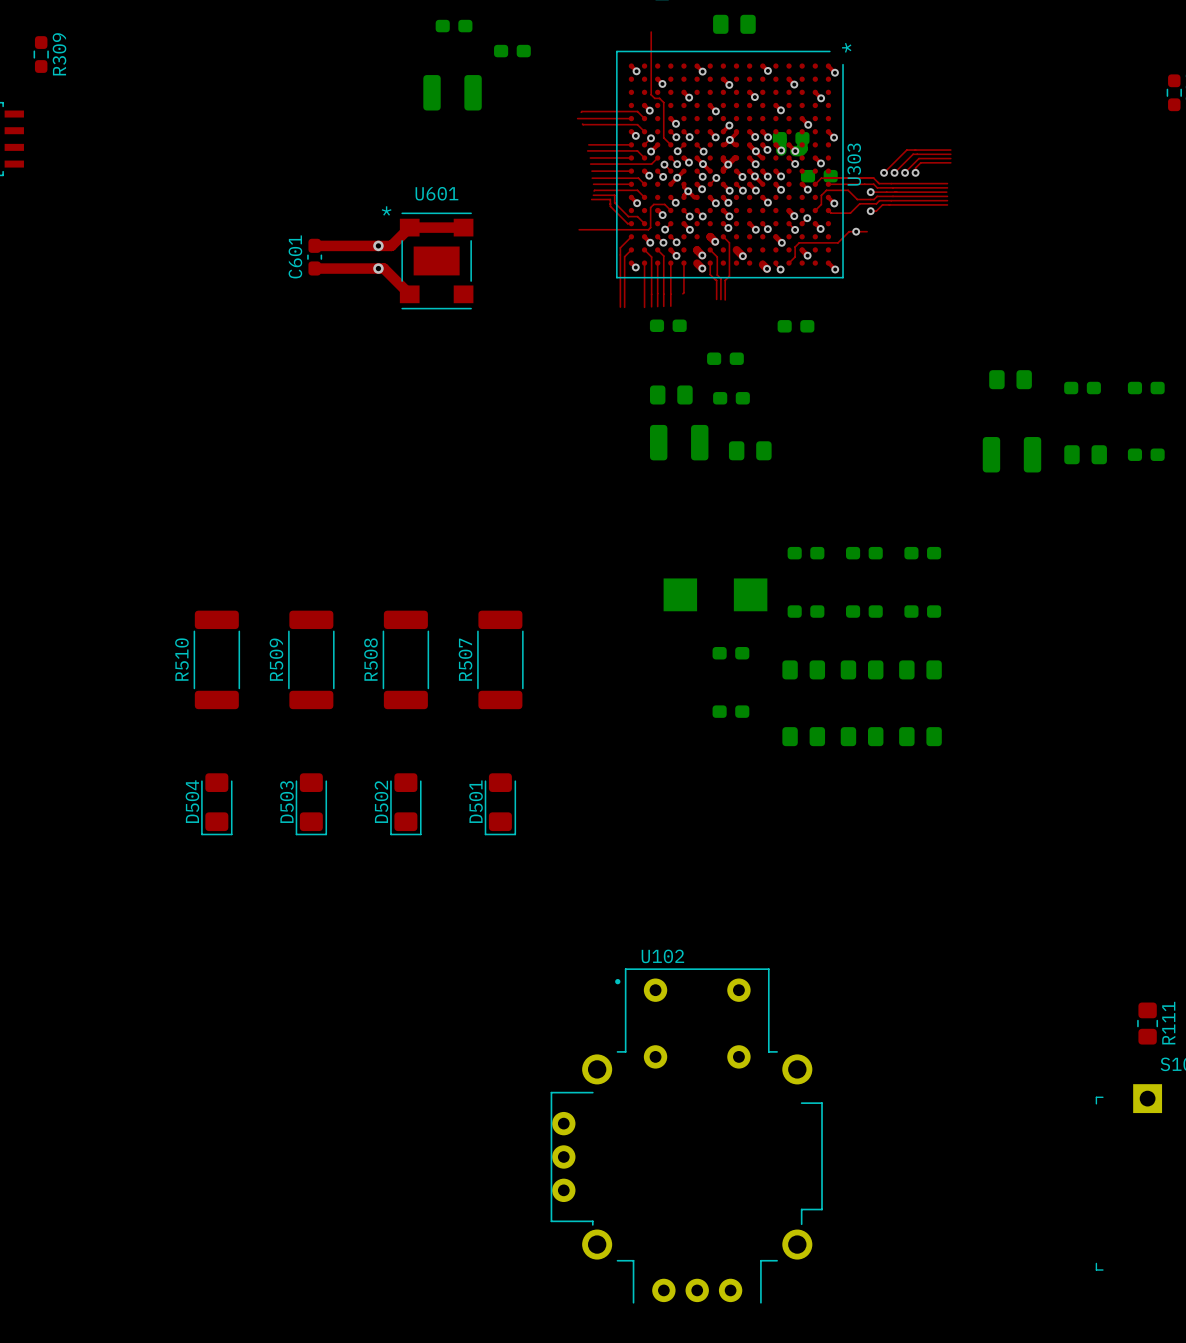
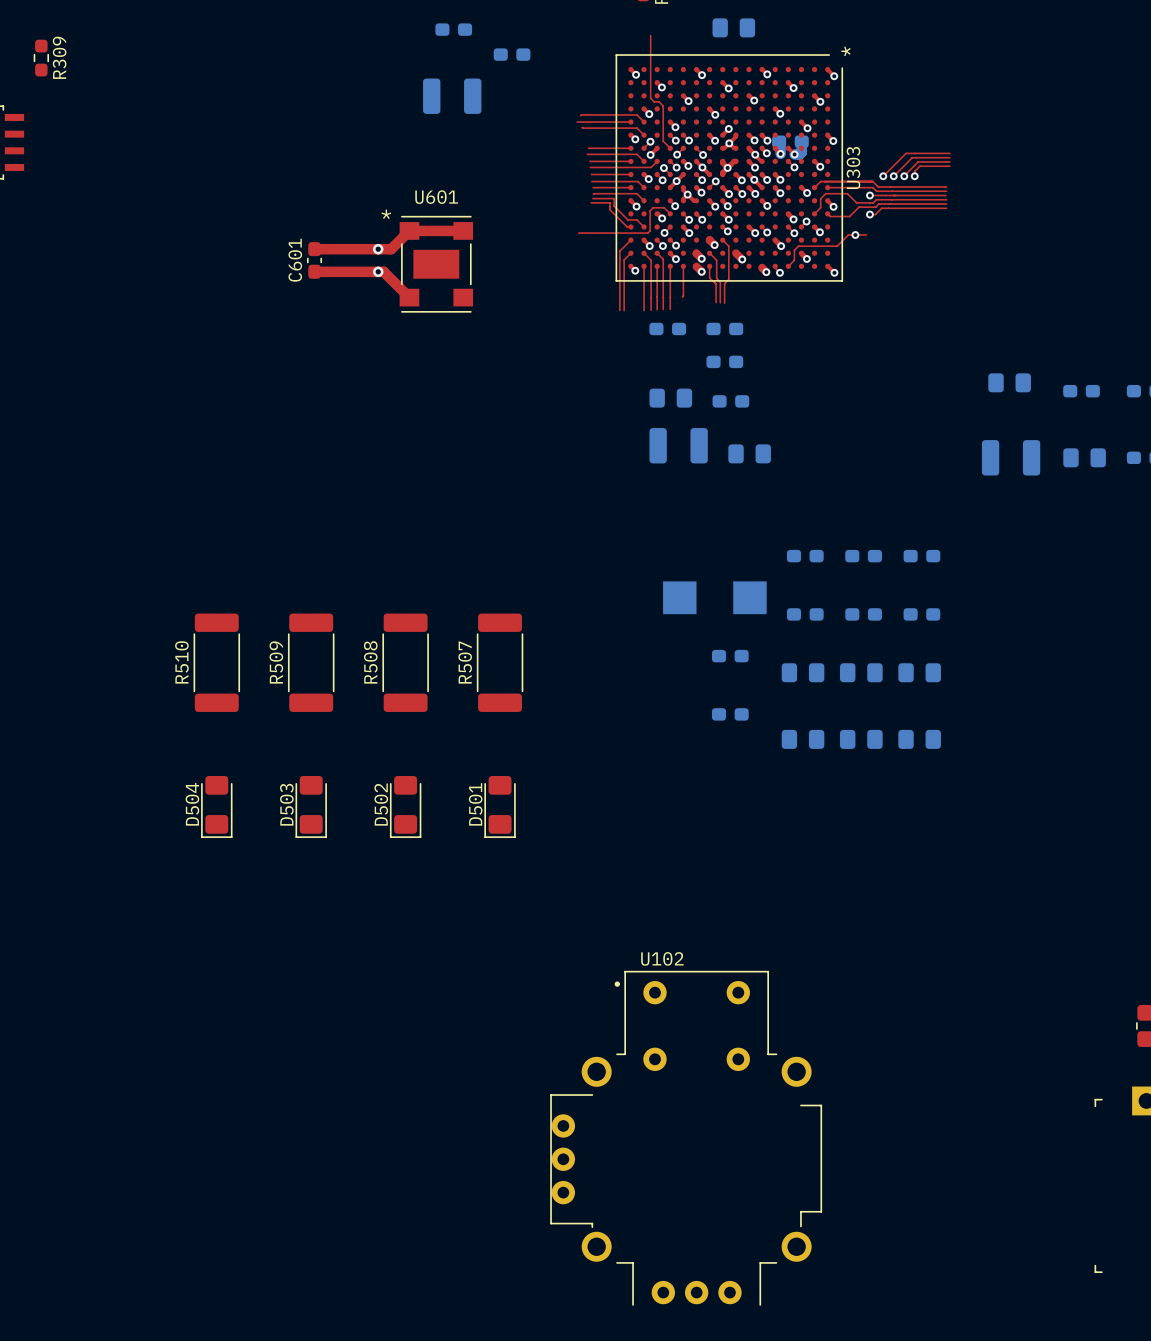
part: (819, 176) -> none
part position: (795, 326) -> (724, 328)

